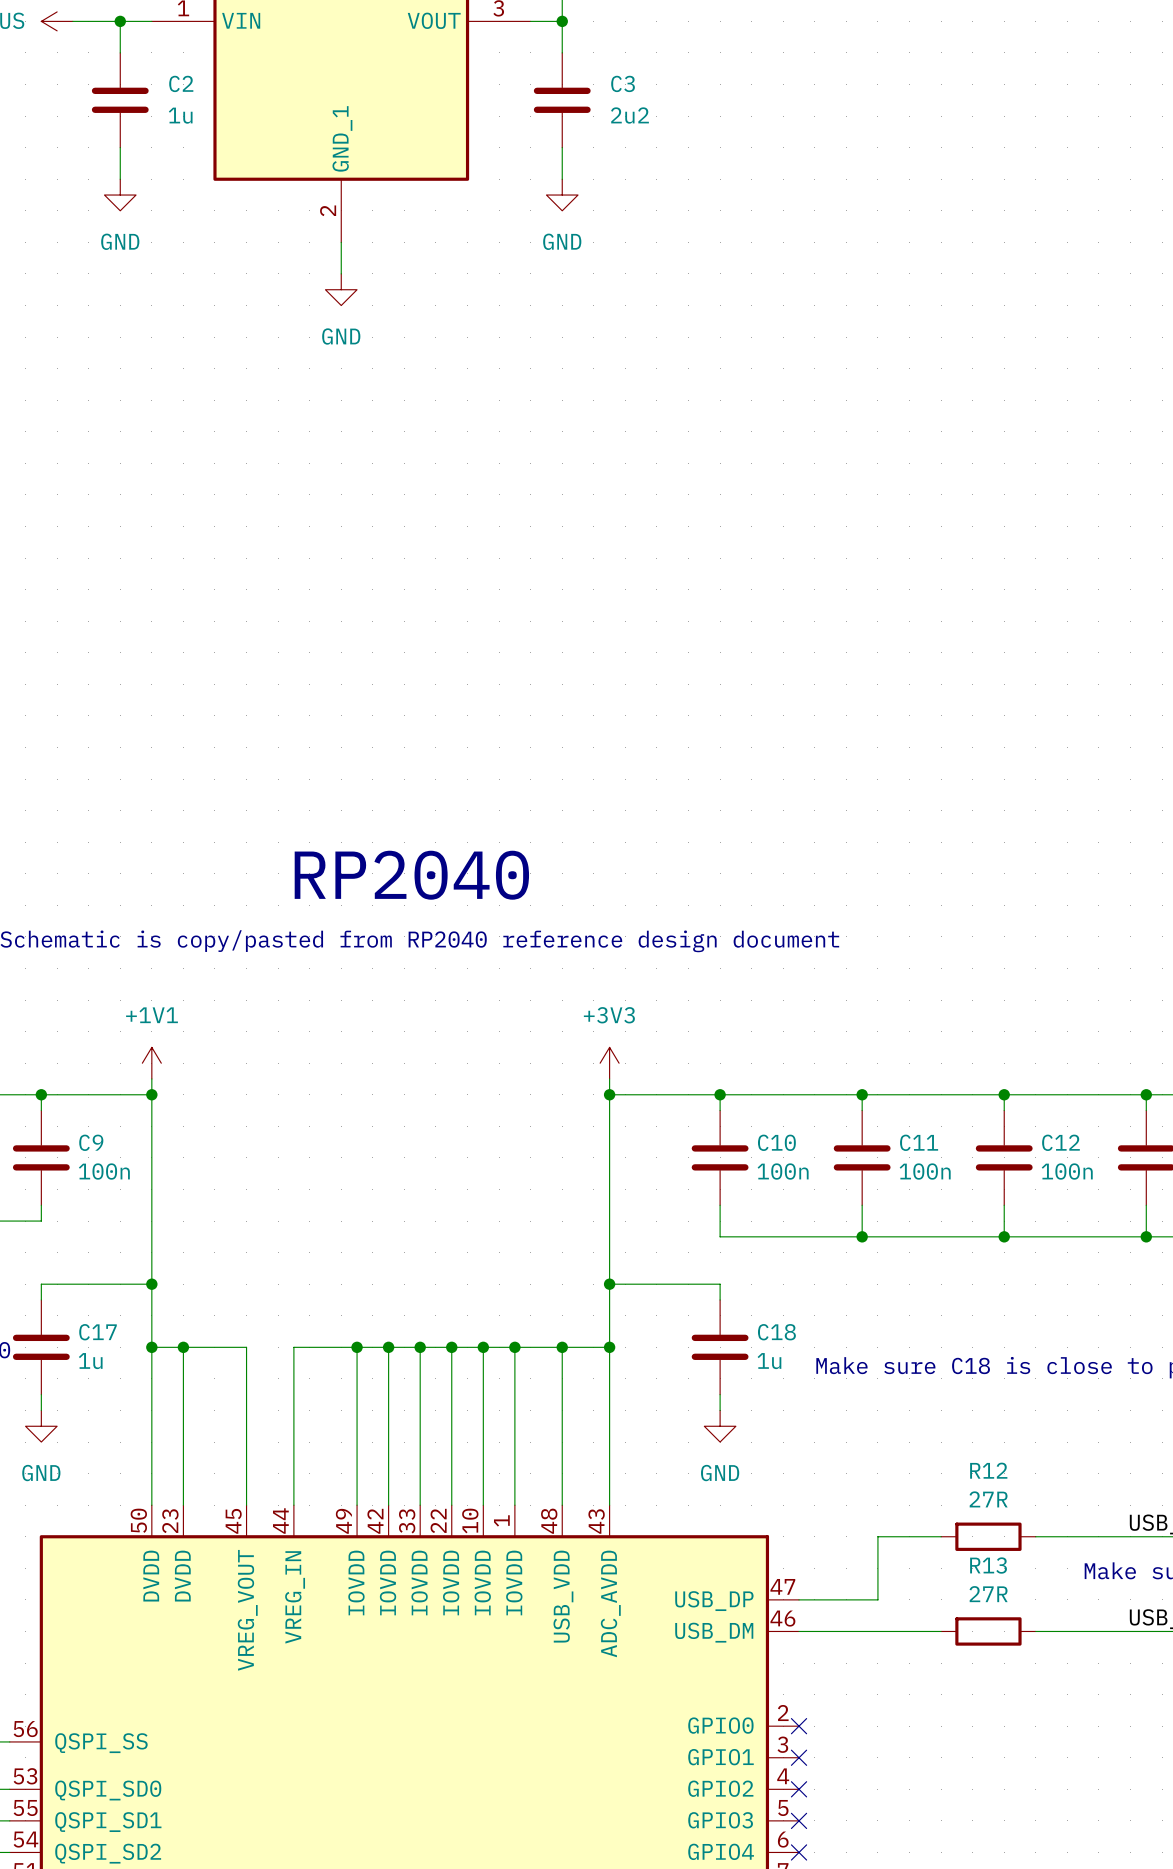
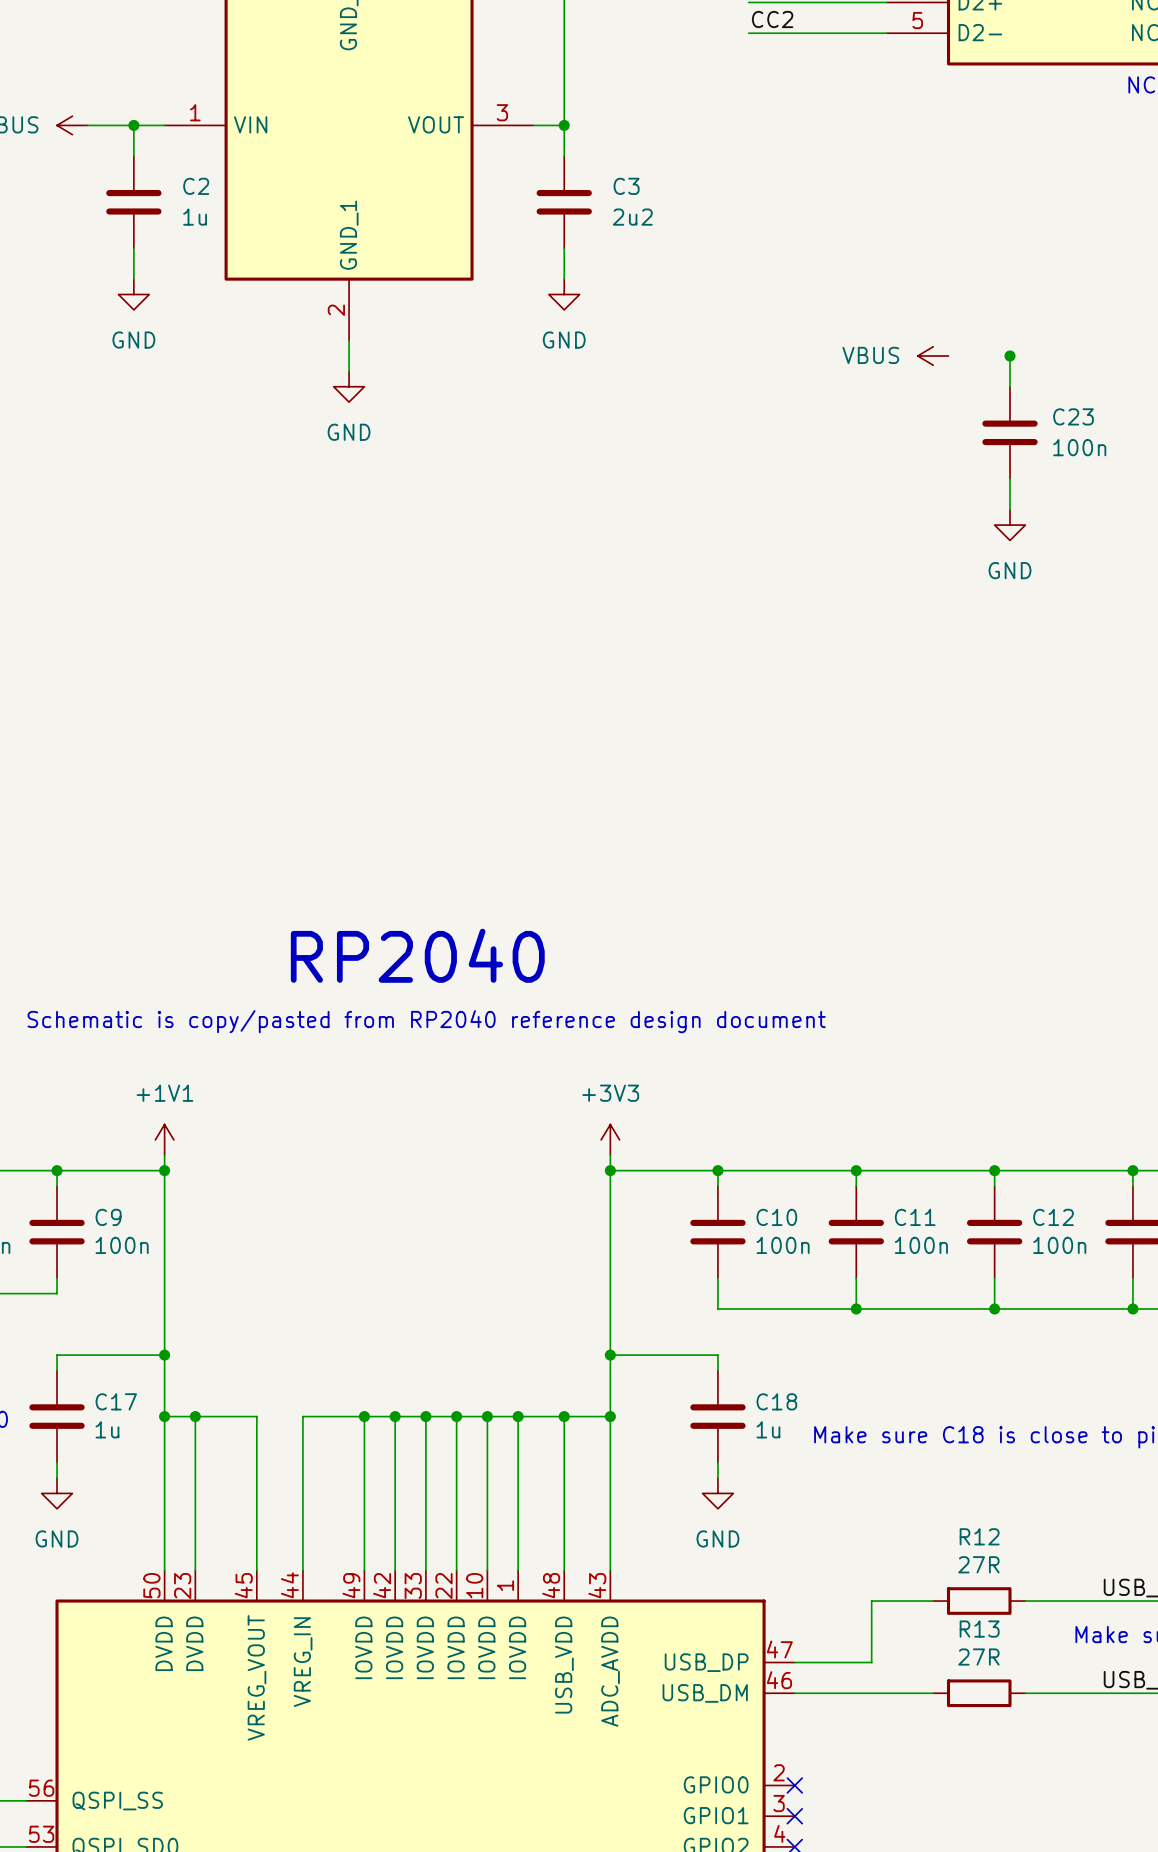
power symbol: none -> VBUS (933, 355)
wire: none -> (1010, 355) (1010, 386)
junction: none -> (1010, 355)
C23: none -> 100n (1010, 432)
wire: none -> (1010, 478) (1010, 509)
power symbol: none -> GND (1010, 525)

